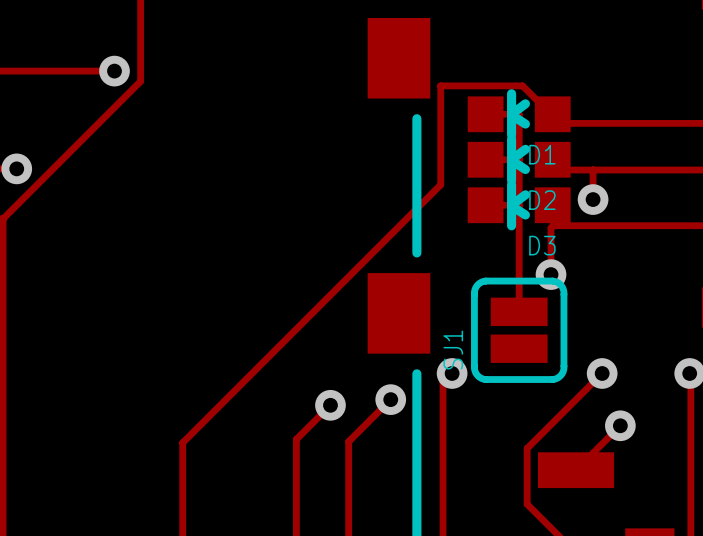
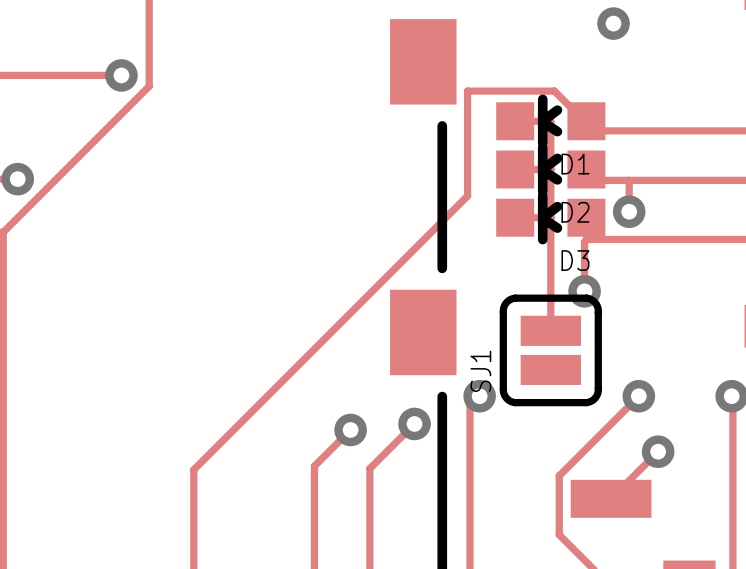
via: none -> (613, 23)

